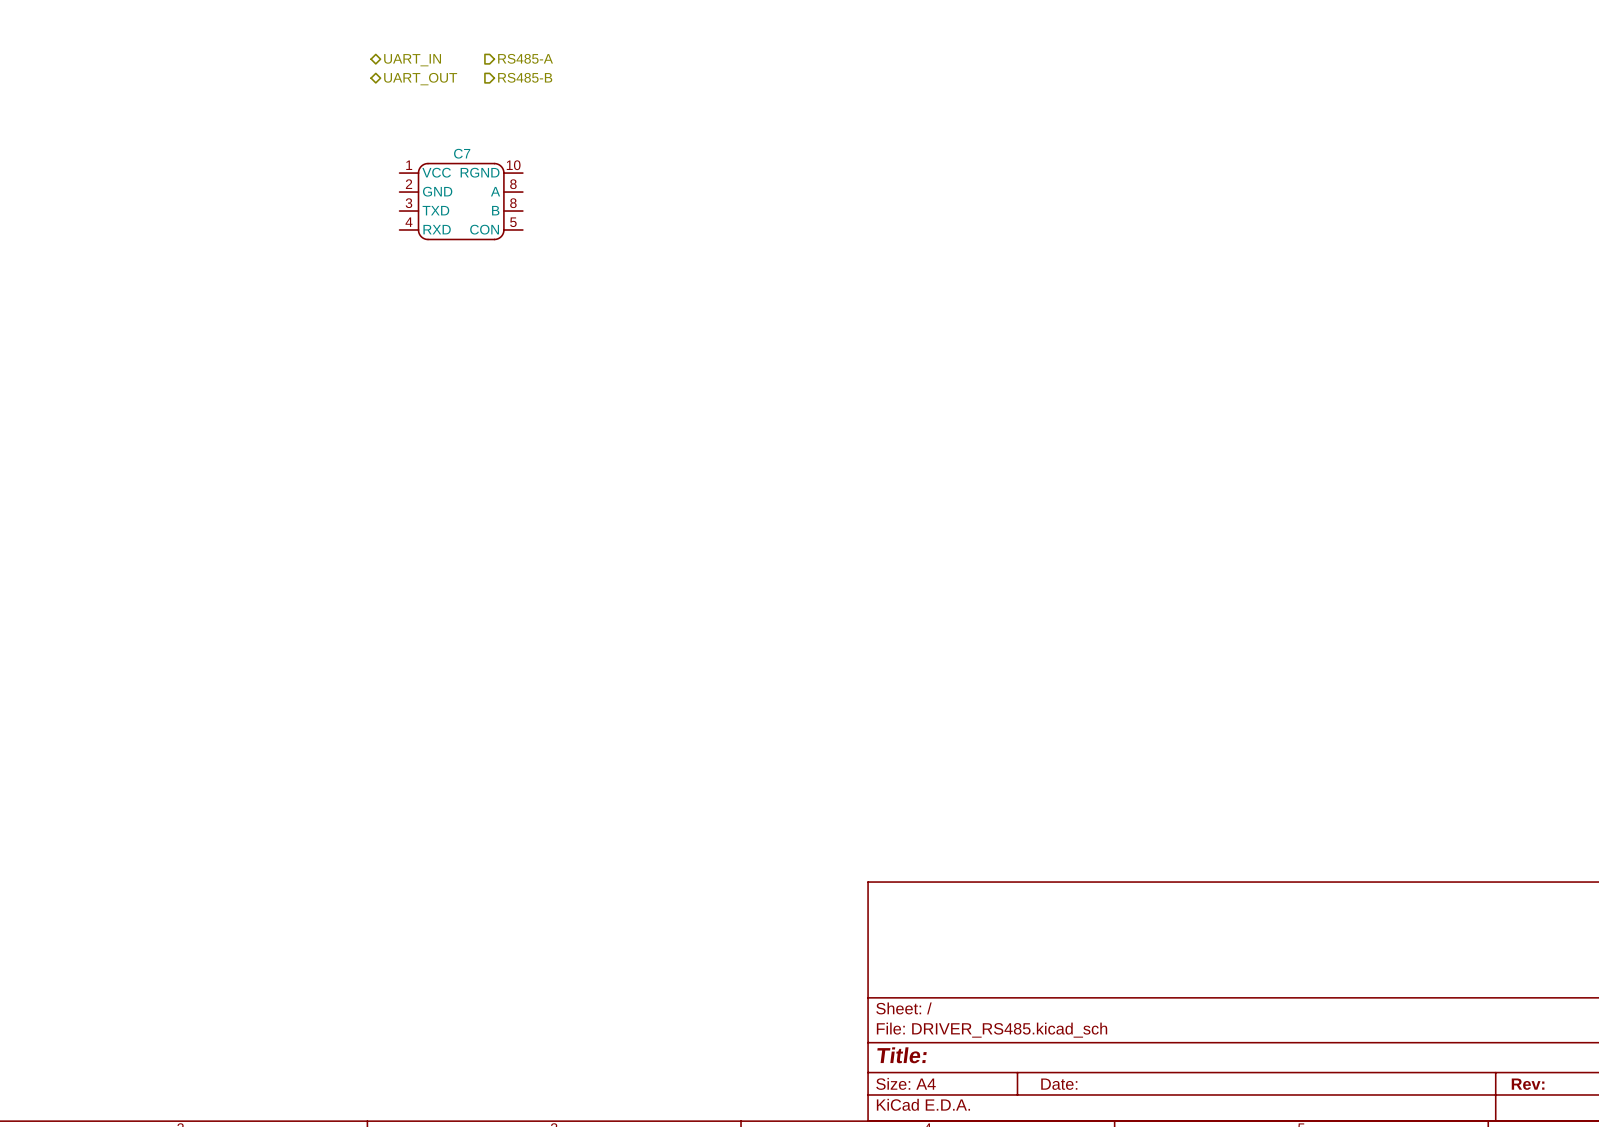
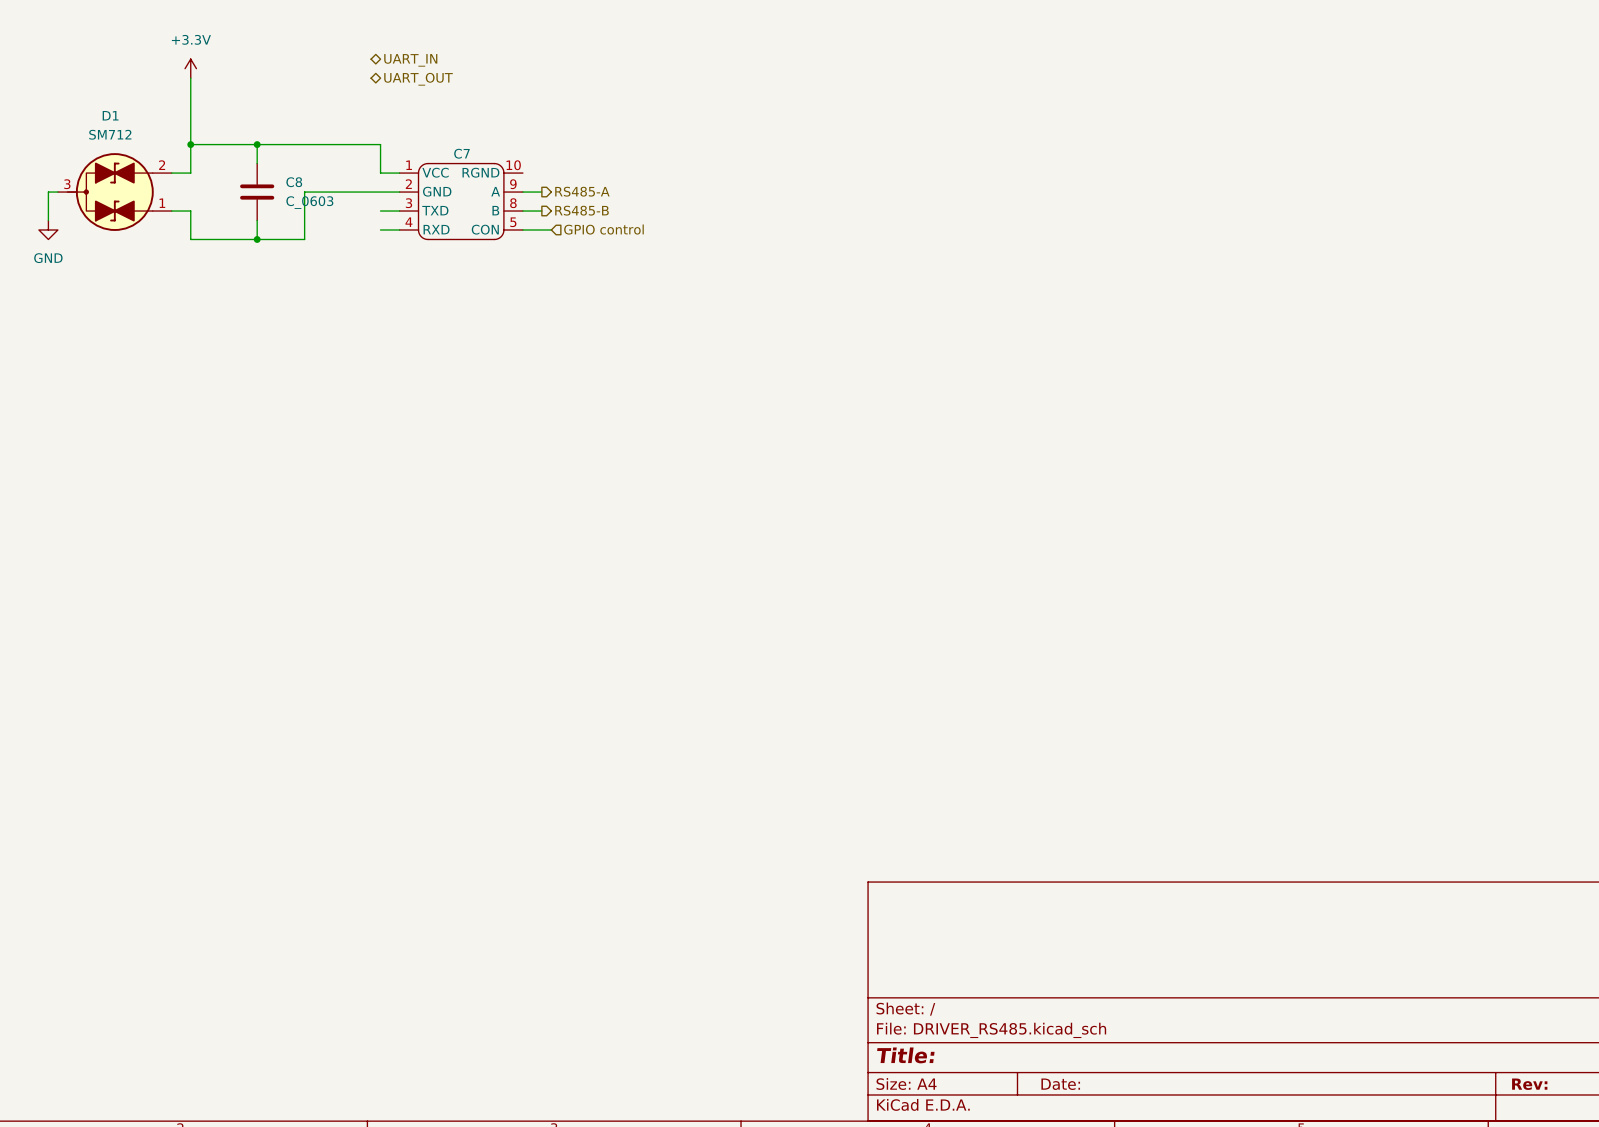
hierarchical label position: RS485-A (525, 58) -> RS485-A (582, 191)
power symbol: none -> +3.3V (190, 68)
hierarchical label position: RS485-B (525, 77) -> RS485-B (582, 210)
wire: none -> (190, 78) (190, 173) (171, 173)
wire: none -> (190, 144) (380, 144) (380, 173) (399, 173)
junction: none -> (190, 144)
wire: none -> (257, 144) (257, 163)
junction: none -> (257, 144)
C7 pin number: 8 (513, 184) -> 9 (513, 184)
wire: none -> (57, 192) (48, 192) (48, 220)
D1: none -> SM712 (114, 192)
C8: none -> C_0603 (257, 192)
wire: none -> (399, 192) (304, 192) (304, 239) (190, 239) (190, 211) (171, 211)
wire: none -> (522, 192) (541, 192)
wire: none -> (380, 211) (399, 211)
wire: none -> (522, 211) (541, 211)
wire: none -> (257, 220) (257, 239)
power symbol: none -> GND (48, 229)
wire: none -> (380, 229) (399, 229)
wire: none -> (522, 229) (551, 229)
hierarchical label: none -> GPIO control (603, 229)
junction: none -> (257, 239)

